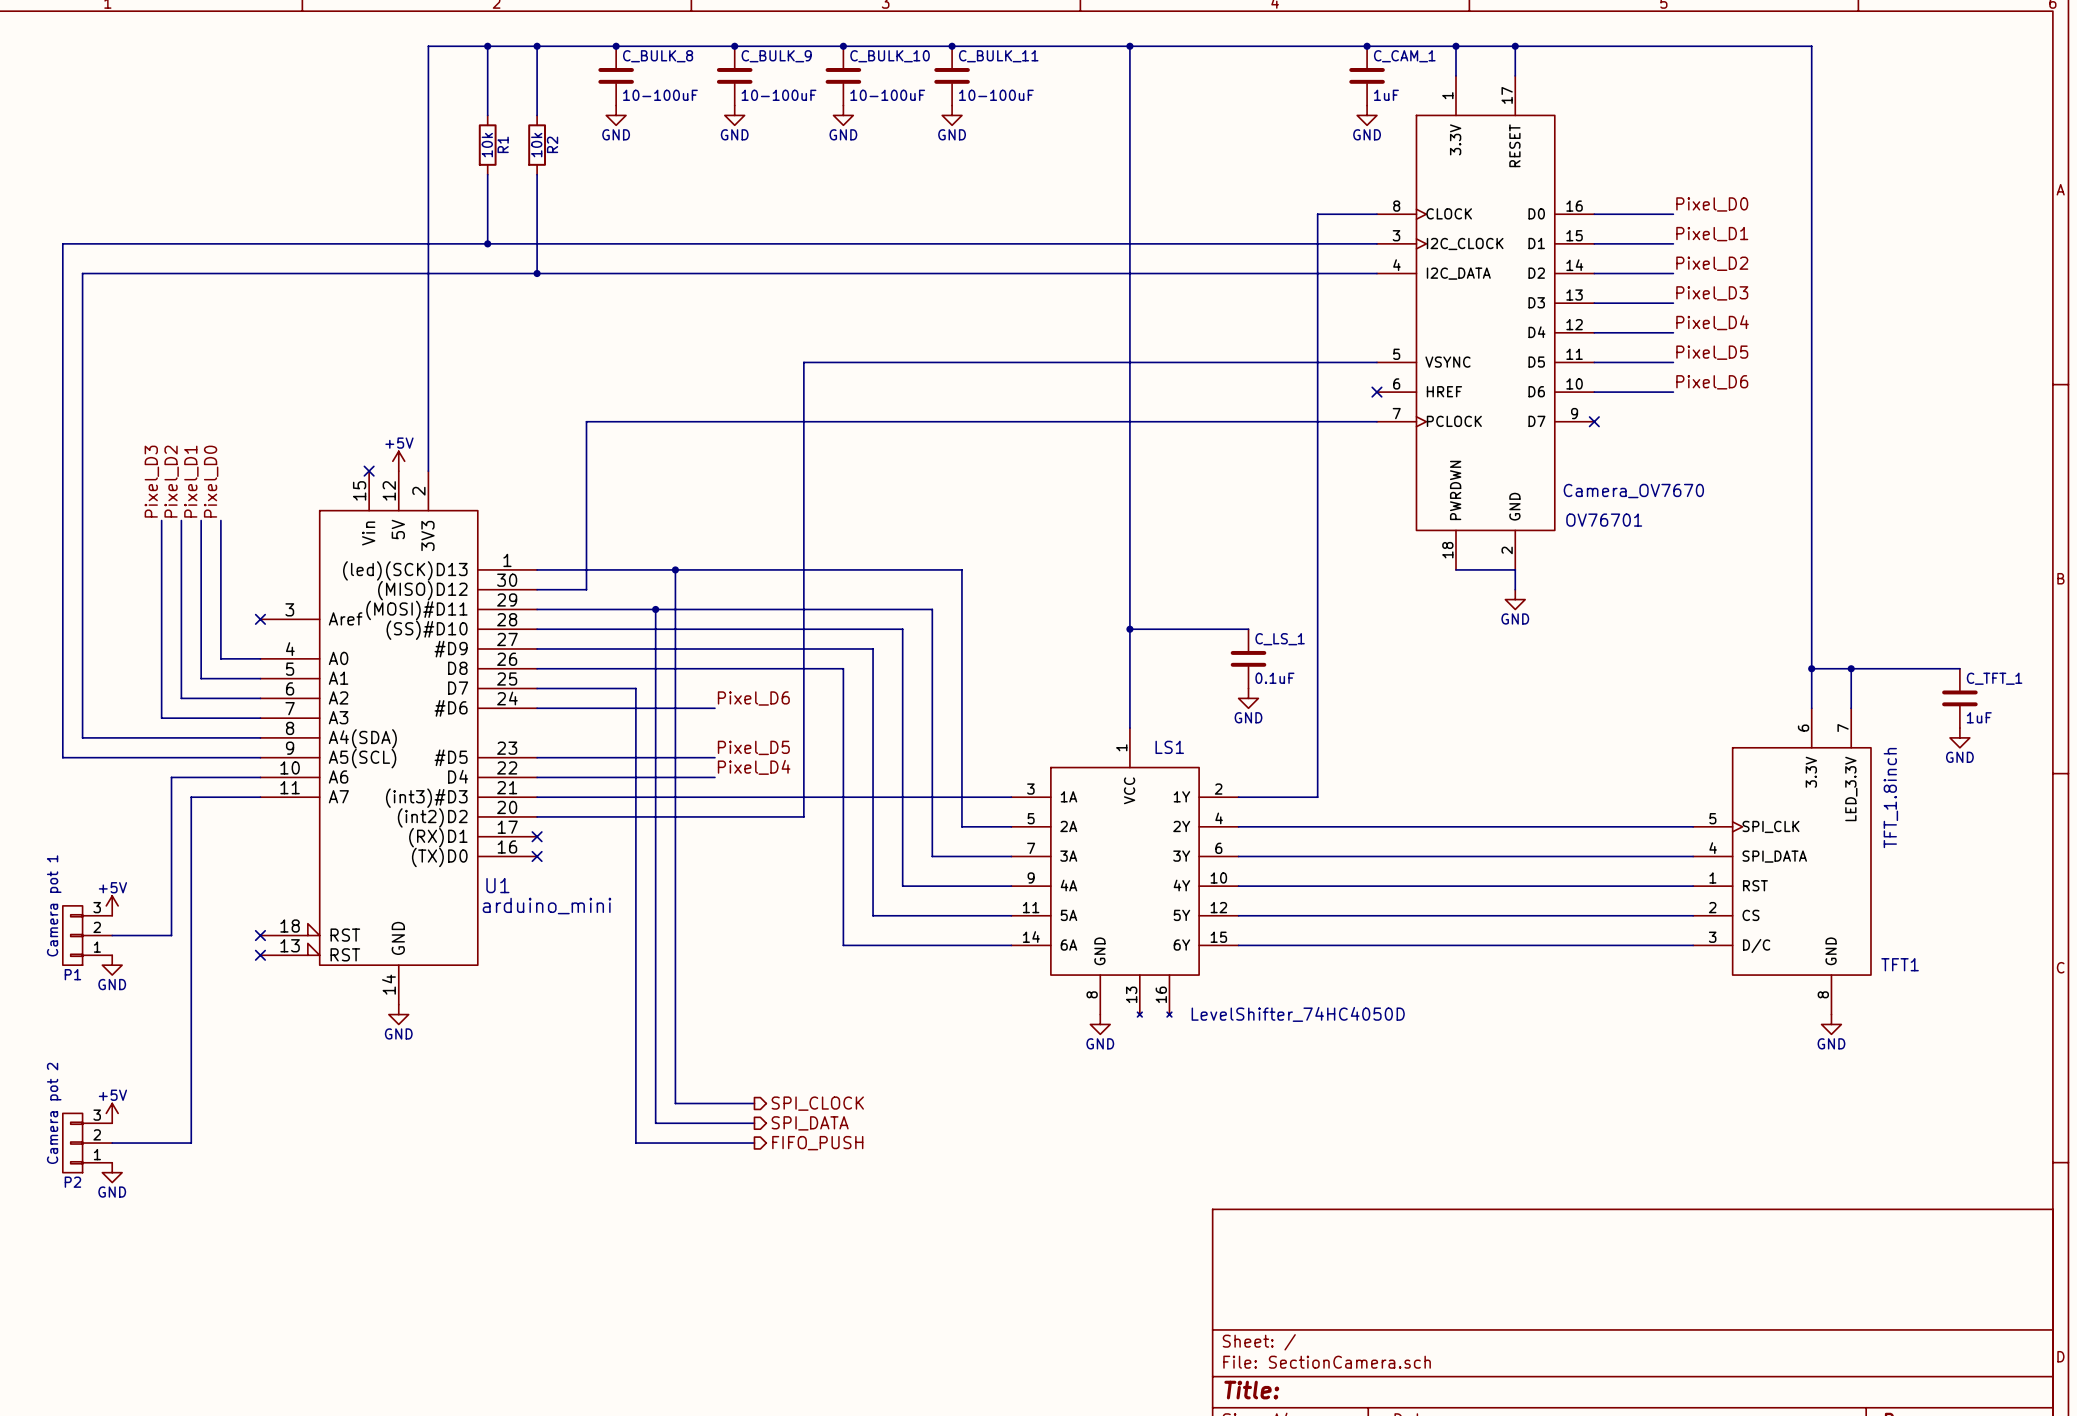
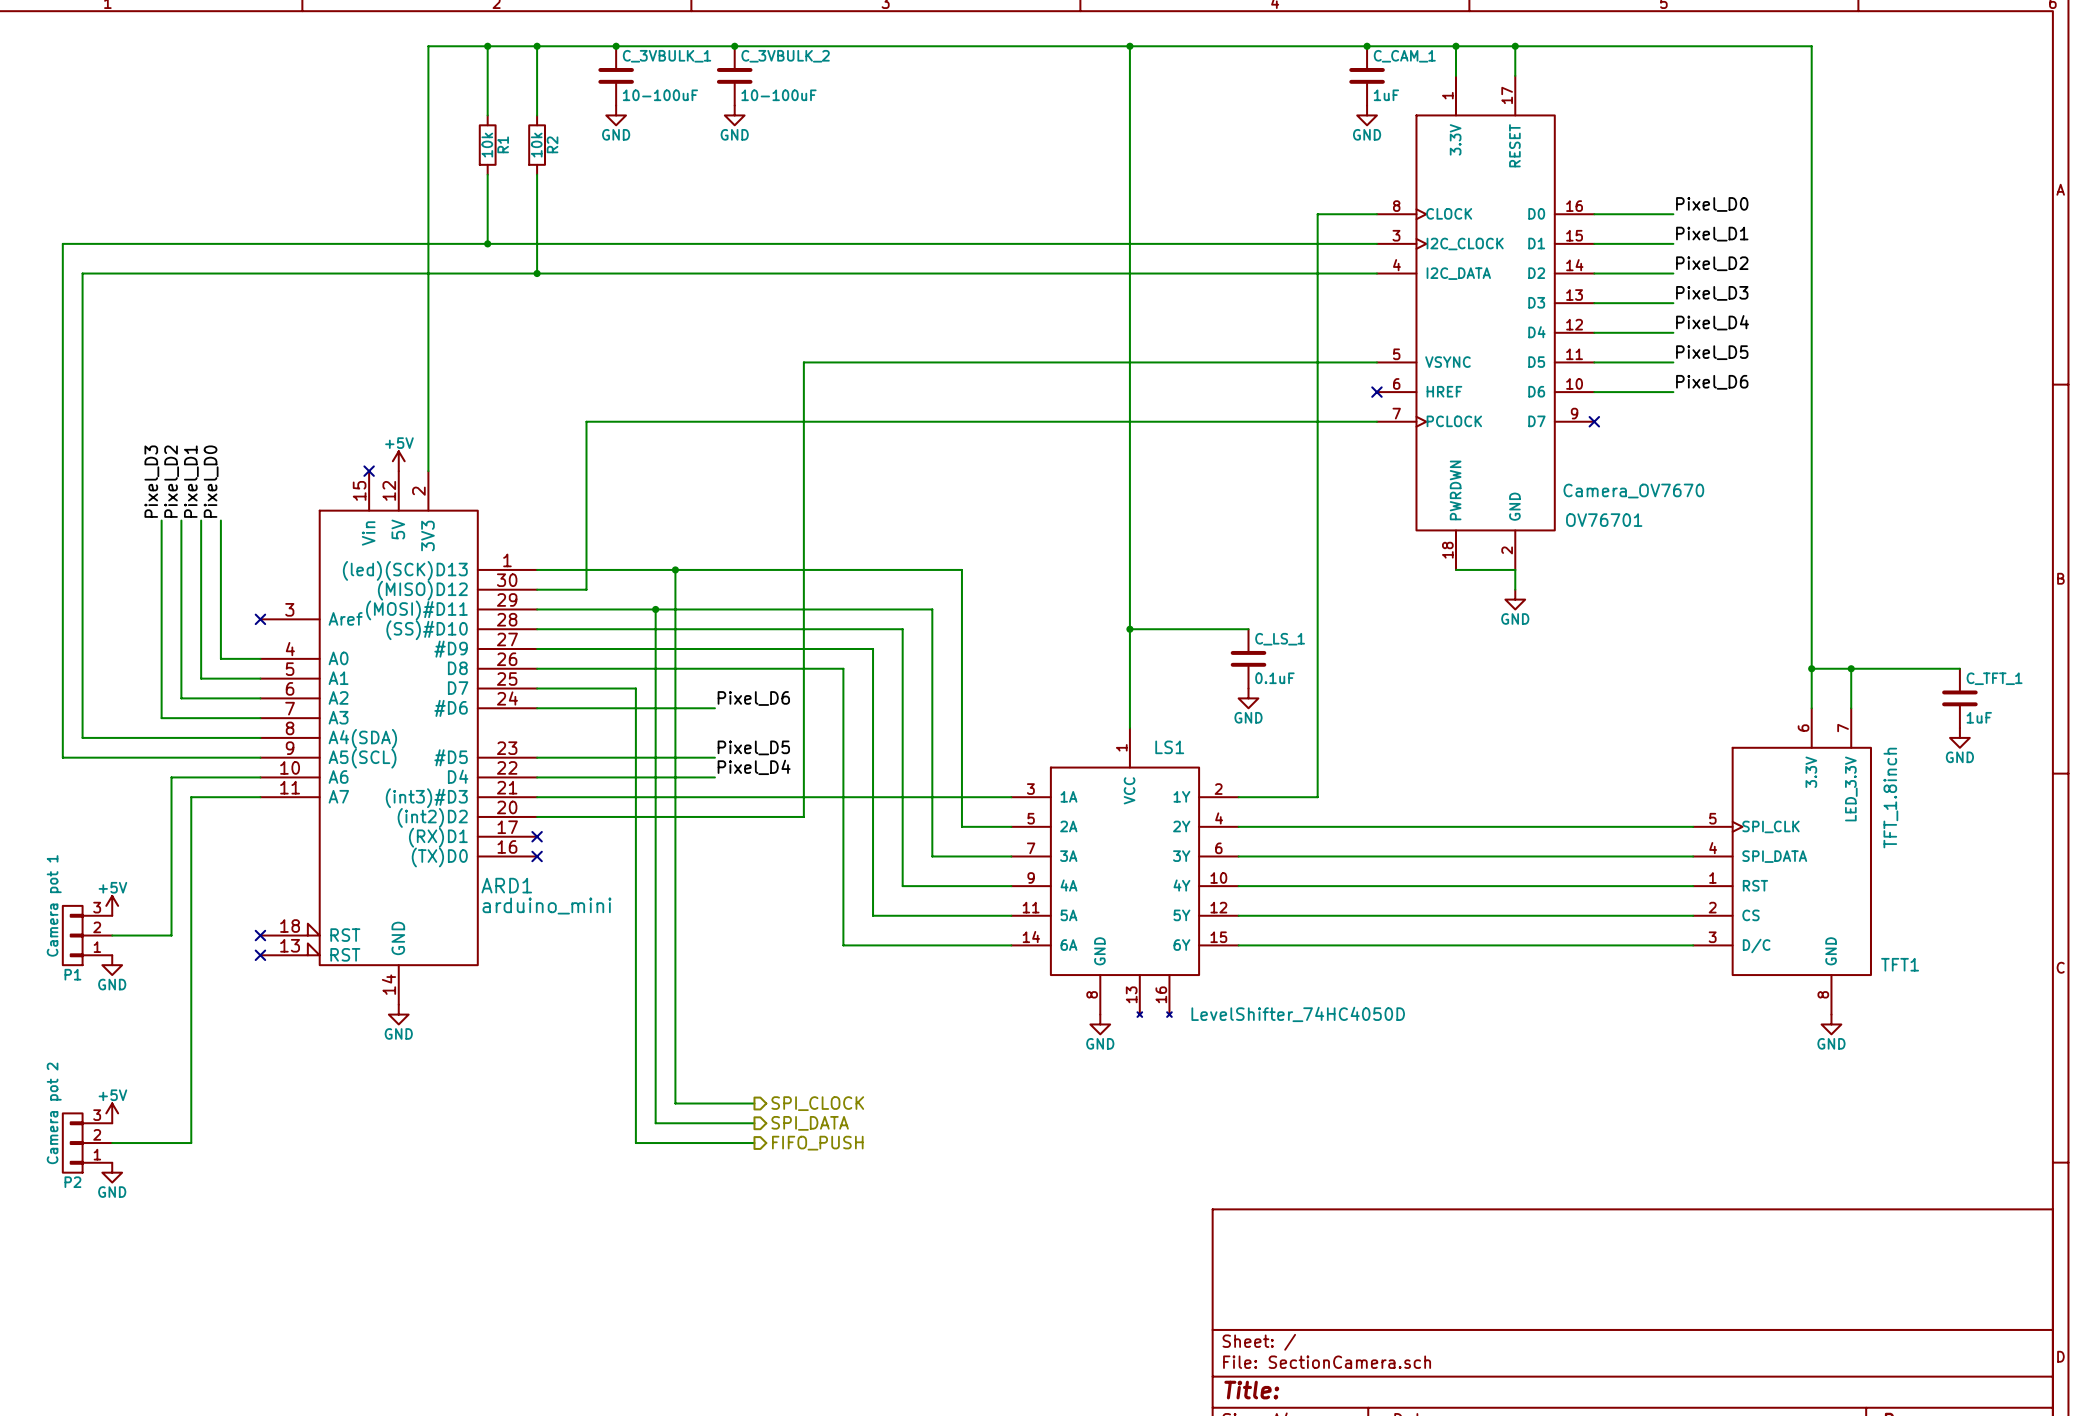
junction: (843, 46) -> none
junction: (952, 46) -> none
C_BULK_8 name: C_BULK_8 (658, 56) -> C_3VBULK_1 (667, 56)
C_BULK_9 name: C_BULK_9 (776, 56) -> C_3VBULK_2 (785, 56)
C_BULK_10: 10-100uF (843, 75) -> none
C_BULK_11: 10-100uF (952, 75) -> none
power symbol: GND (843, 115) -> none
power symbol: GND (952, 115) -> none
U1 name: U1 (497, 885) -> ARD1 (506, 885)

